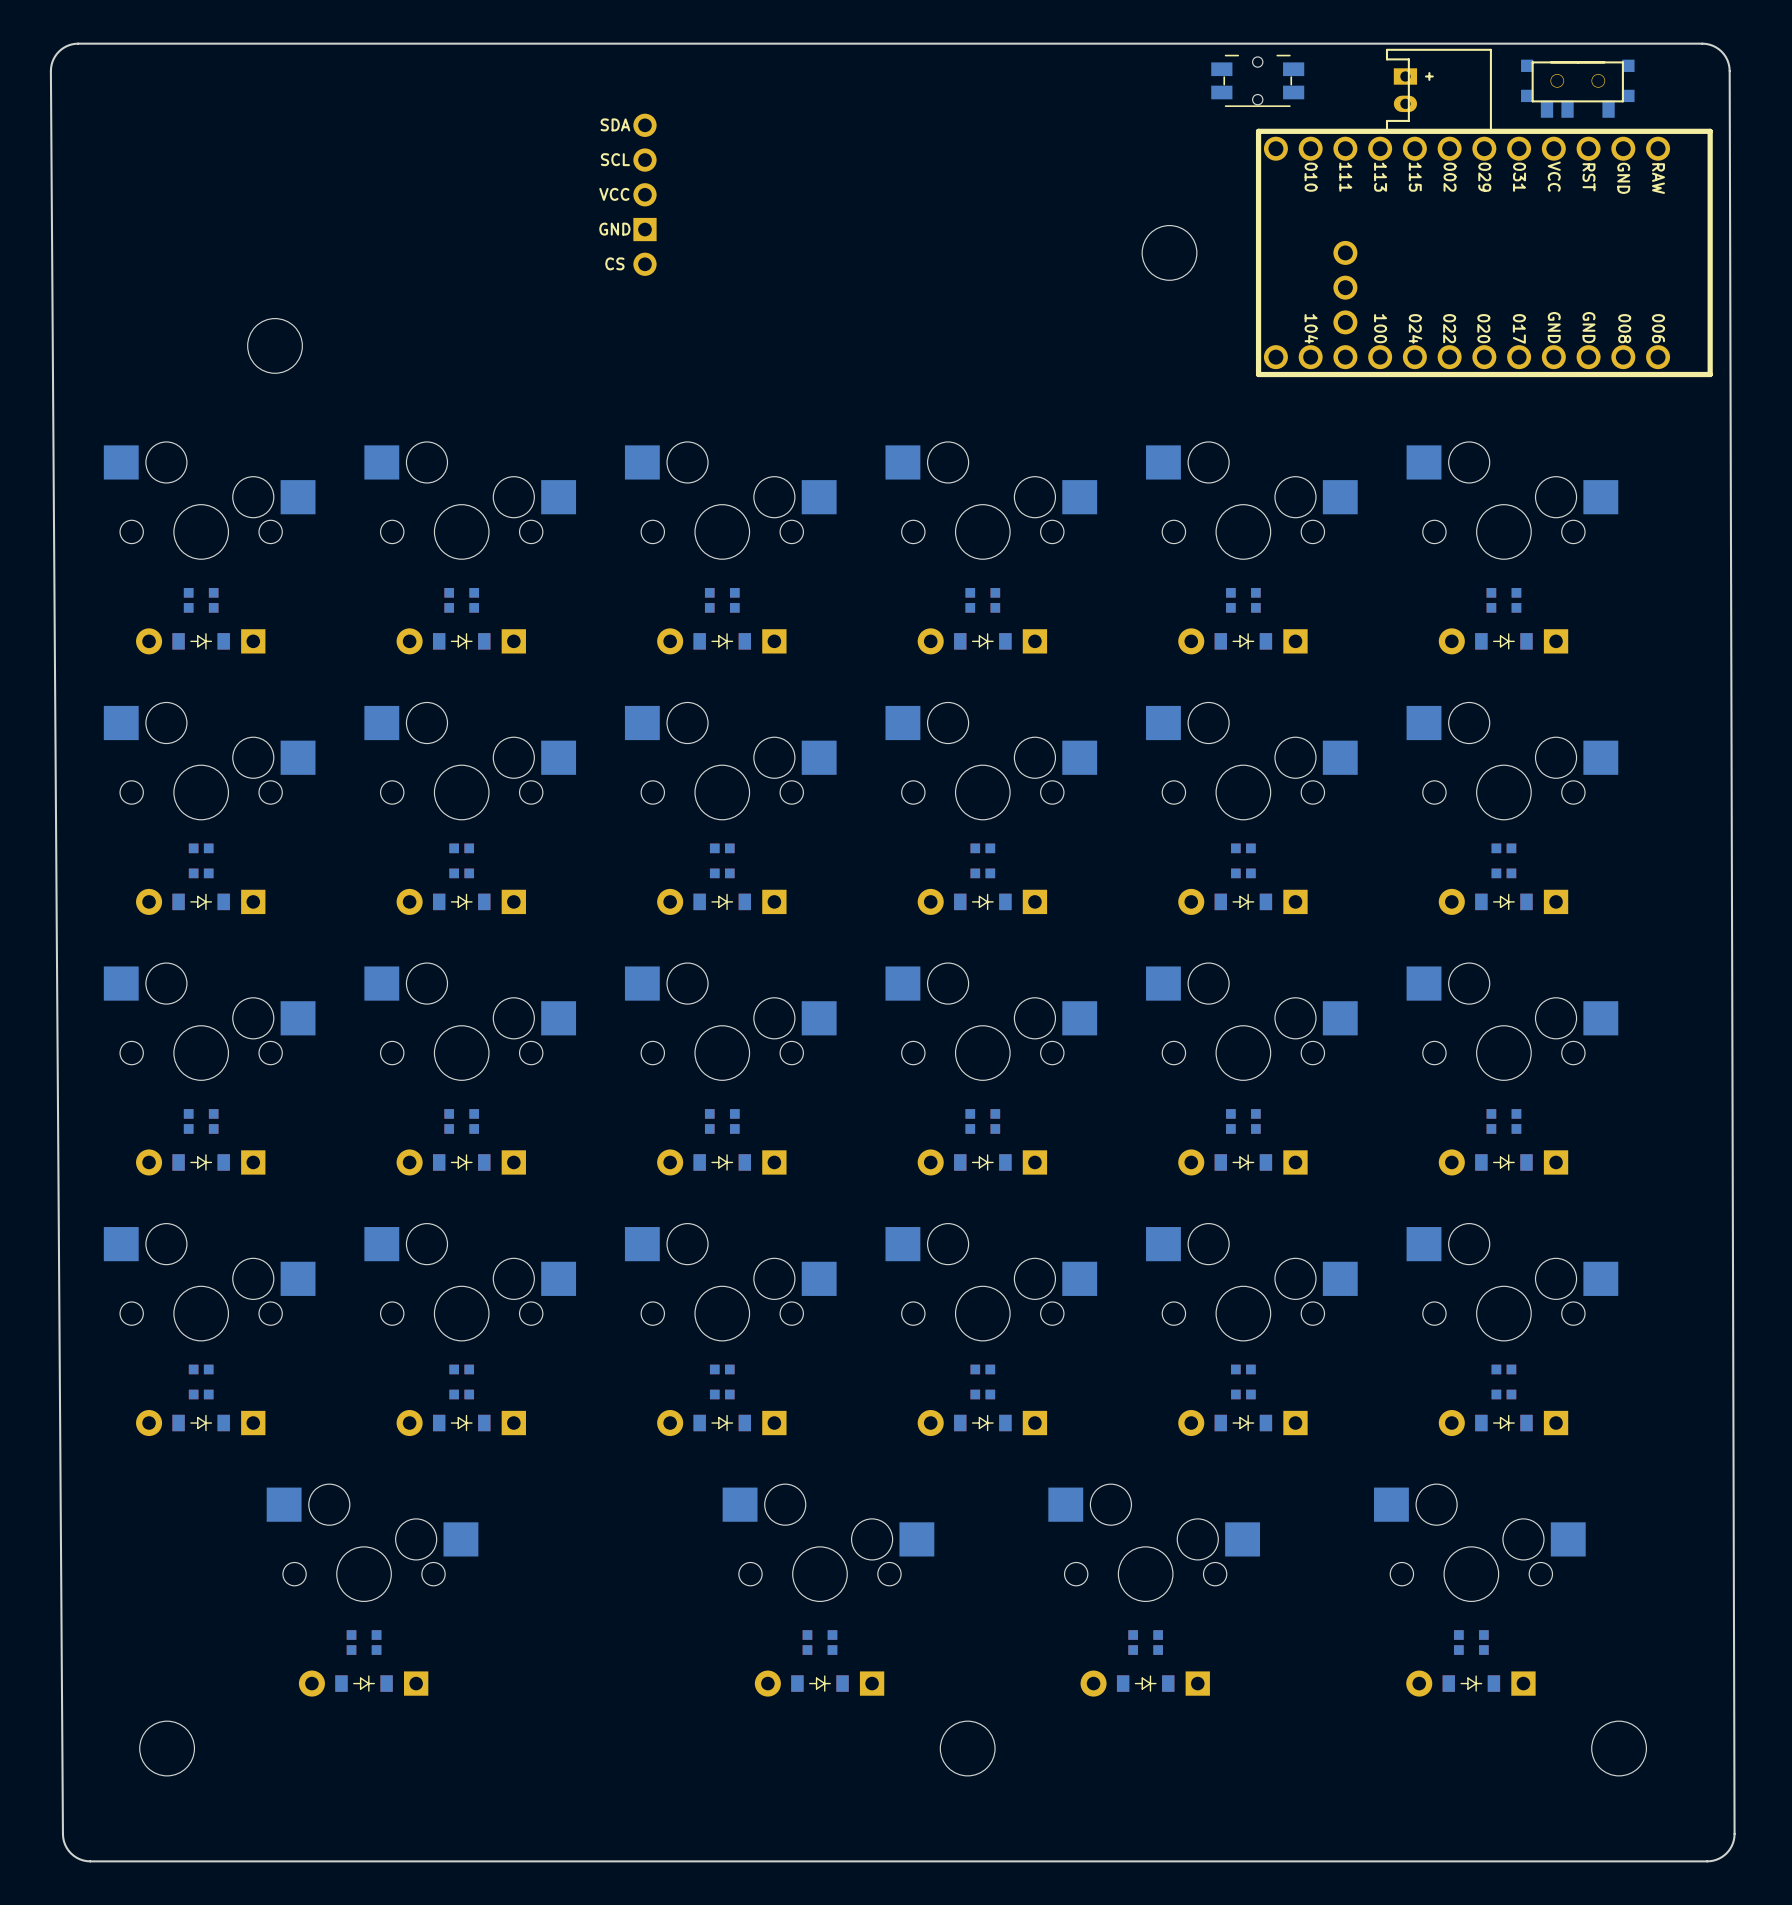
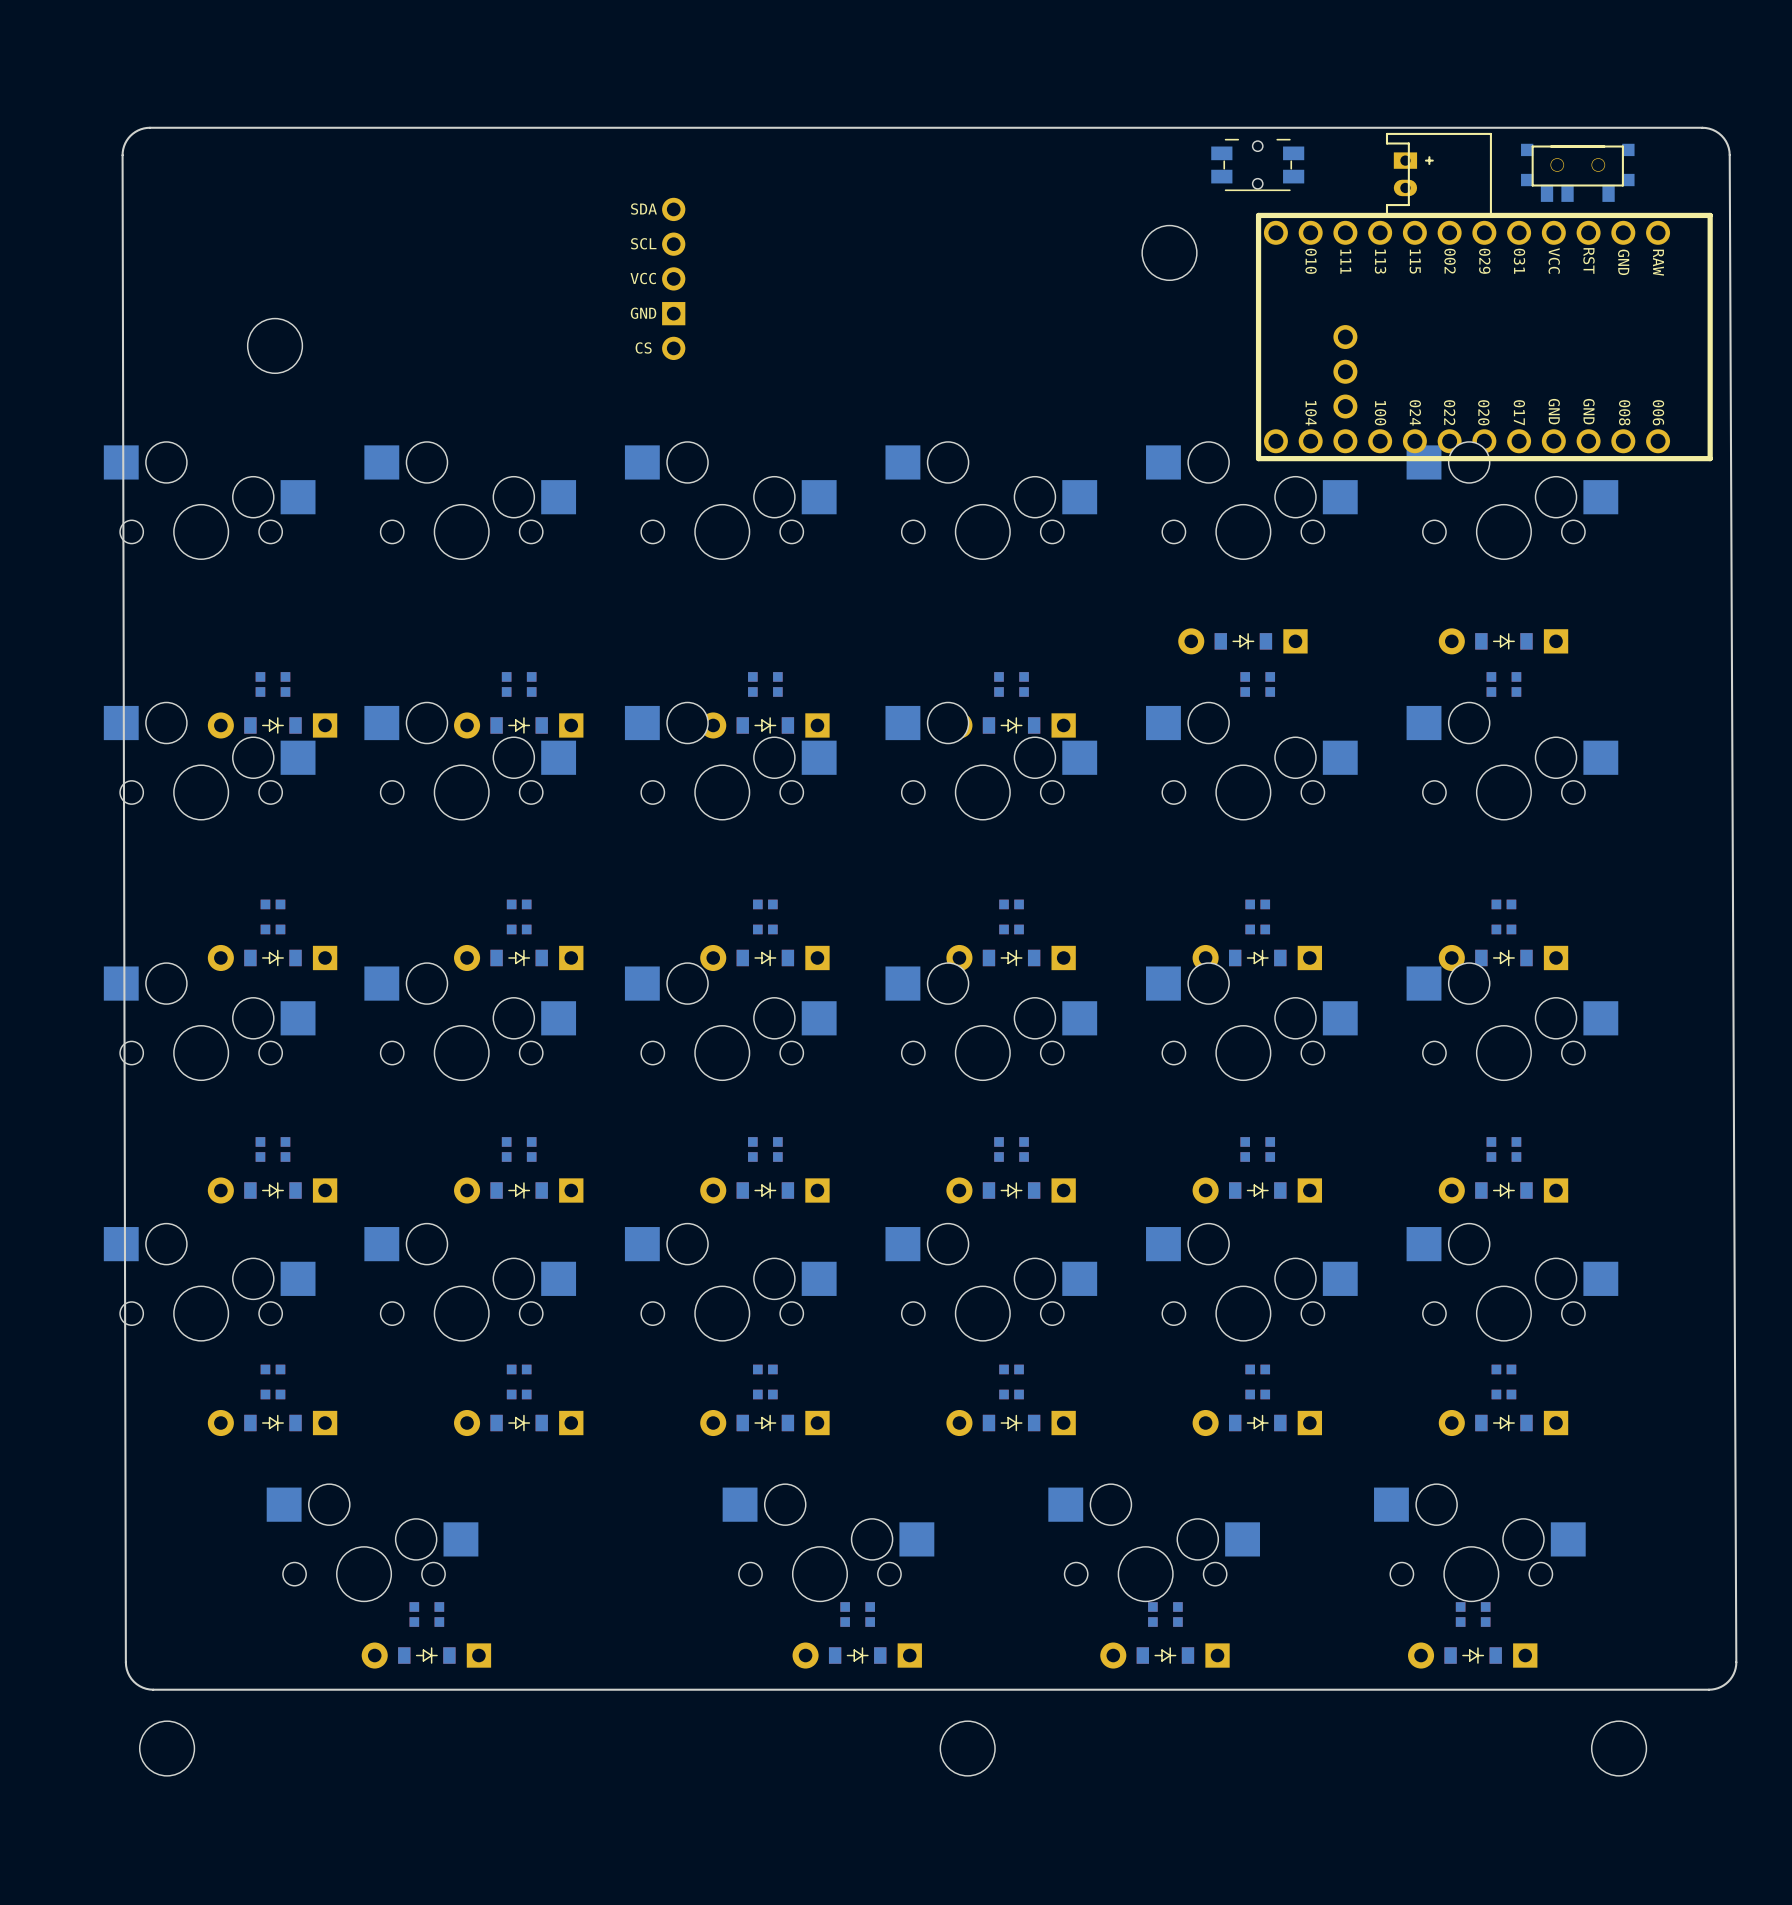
board edge: (1702, 43) (78, 43) (69, 45) (58, 51) (53, 59) (50, 71) (62, 1834) (65, 1844) (71, 1853) (79, 1859) (90, 1861) (1707, 1861) (1719, 1858) (1726, 1853) (1731, 1845) (1734, 1833) (1729, 70) (1727, 60) (1721, 51) (1712, 45) (1702, 43) -> (1702, 127) (1712, 129) (1721, 135) (1727, 144) (1729, 155) (1736, 1662) (1733, 1674) (1728, 1681) (1720, 1686) (1708, 1689) (153, 1689) (142, 1687) (133, 1681) (127, 1672) (125, 1662) (122, 155) (125, 143) (130, 135) (138, 130) (149, 127) (1702, 127)
part position: (1257, 80) -> (1257, 164)
part position: (1577, 88) -> (1577, 172)
part position: (1438, 90) -> (1438, 174)
part position: (644, 194) -> (673, 278)
part position: (1484, 252) -> (1484, 337)
part: (201, 600) -> none
part: (461, 600) -> none
part: (722, 600) -> none
part position: (982, 600) -> (1011, 684)
part position: (1243, 600) -> (1257, 684)
part position: (1503, 600) -> (1503, 684)
part: (200, 641) -> none
part: (461, 641) -> none
part: (721, 641) -> none
part position: (982, 641) -> (1011, 725)
part: none -> (272, 684)
part: none -> (519, 684)
part: none -> (765, 684)
part: none -> (272, 725)
part: none -> (518, 725)
part: none -> (764, 725)
part position: (201, 860) -> (272, 916)
part position: (461, 860) -> (519, 916)
part position: (722, 860) -> (765, 916)
part position: (982, 860) -> (1011, 916)
part position: (1243, 860) -> (1257, 916)
part position: (1503, 860) -> (1503, 916)
part position: (200, 901) -> (272, 957)
part position: (461, 901) -> (518, 957)
part position: (721, 901) -> (764, 957)
part position: (982, 901) -> (1011, 957)
part position: (1242, 901) -> (1257, 957)
part position: (1503, 901) -> (1503, 957)
part position: (201, 1121) -> (272, 1149)
part position: (461, 1121) -> (519, 1149)
part position: (722, 1121) -> (765, 1149)
part position: (982, 1121) -> (1011, 1149)
part position: (1243, 1121) -> (1257, 1149)
part: (1503, 1121) -> none
part footprint: [1438, 1149, 1569, 1176] -> [1486, 1137, 1522, 1162]
part position: (200, 1162) -> (272, 1190)
part position: (461, 1162) -> (518, 1190)
part position: (721, 1162) -> (764, 1190)
part position: (982, 1162) -> (1011, 1190)
part position: (1242, 1162) -> (1257, 1190)
part: none -> (1503, 1190)
part position: (201, 1381) -> (272, 1381)
part position: (461, 1381) -> (519, 1381)
part position: (722, 1381) -> (765, 1381)
part position: (982, 1381) -> (1011, 1381)
part position: (1243, 1381) -> (1257, 1381)
part position: (200, 1423) -> (272, 1423)
part position: (461, 1423) -> (518, 1423)
part position: (721, 1423) -> (764, 1423)
part position: (982, 1423) -> (1011, 1423)
part position: (1242, 1423) -> (1257, 1423)
part: none -> (1473, 1614)
part footprint: [1454, 1630, 1489, 1655] -> [1408, 1642, 1538, 1669]
part position: (364, 1642) -> (426, 1614)
part position: (819, 1642) -> (857, 1614)
part position: (1145, 1642) -> (1165, 1614)
part position: (363, 1683) -> (426, 1655)
part position: (819, 1683) -> (857, 1655)
part position: (1145, 1683) -> (1164, 1655)
part: (1470, 1683) -> none

